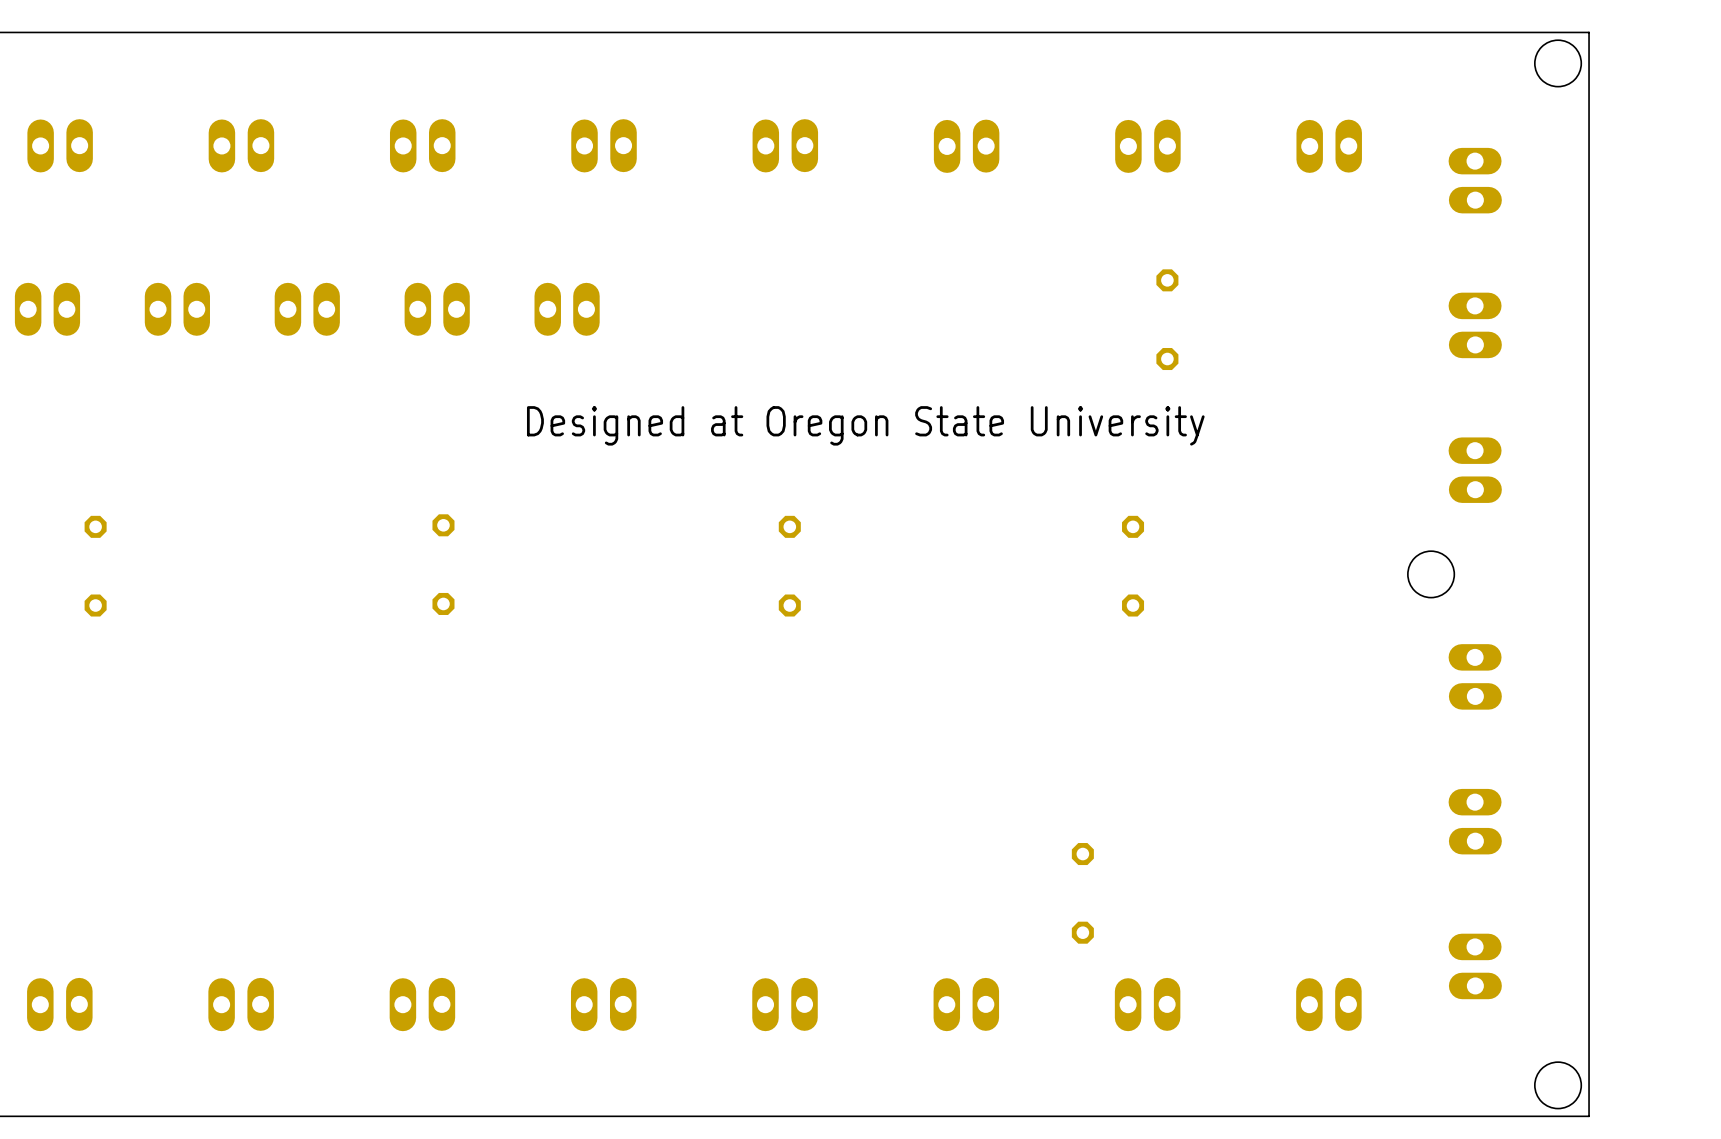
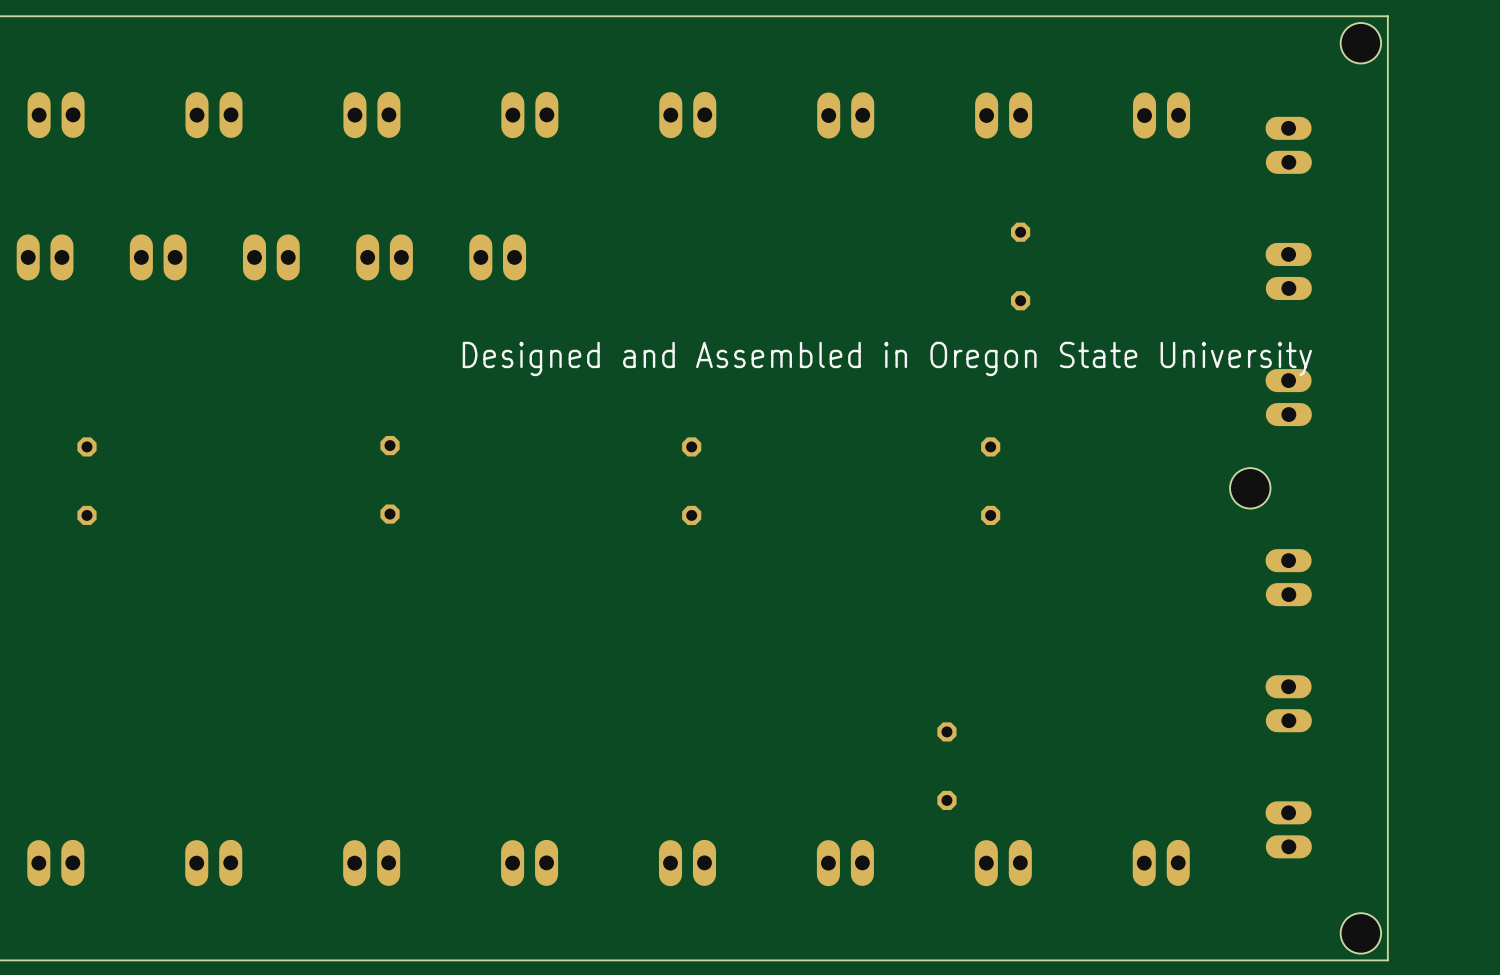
text: Designed at Oregon State University (865, 425) -> Designed and Assembled in Oregon State University (887, 358)

